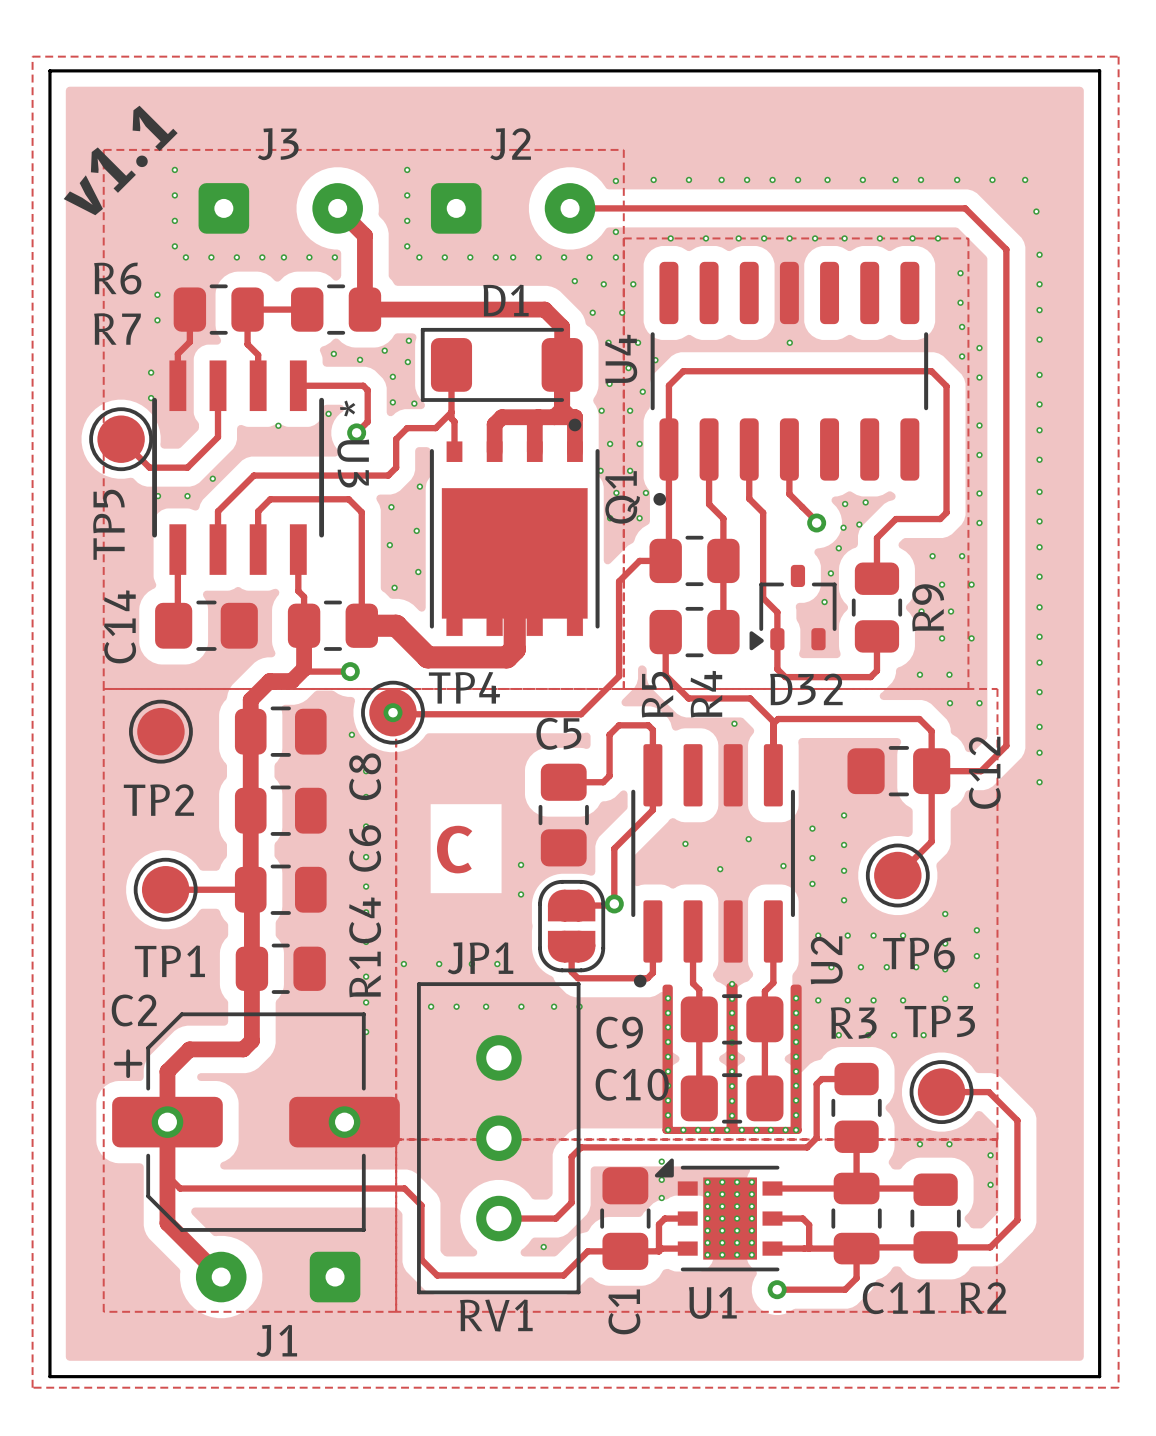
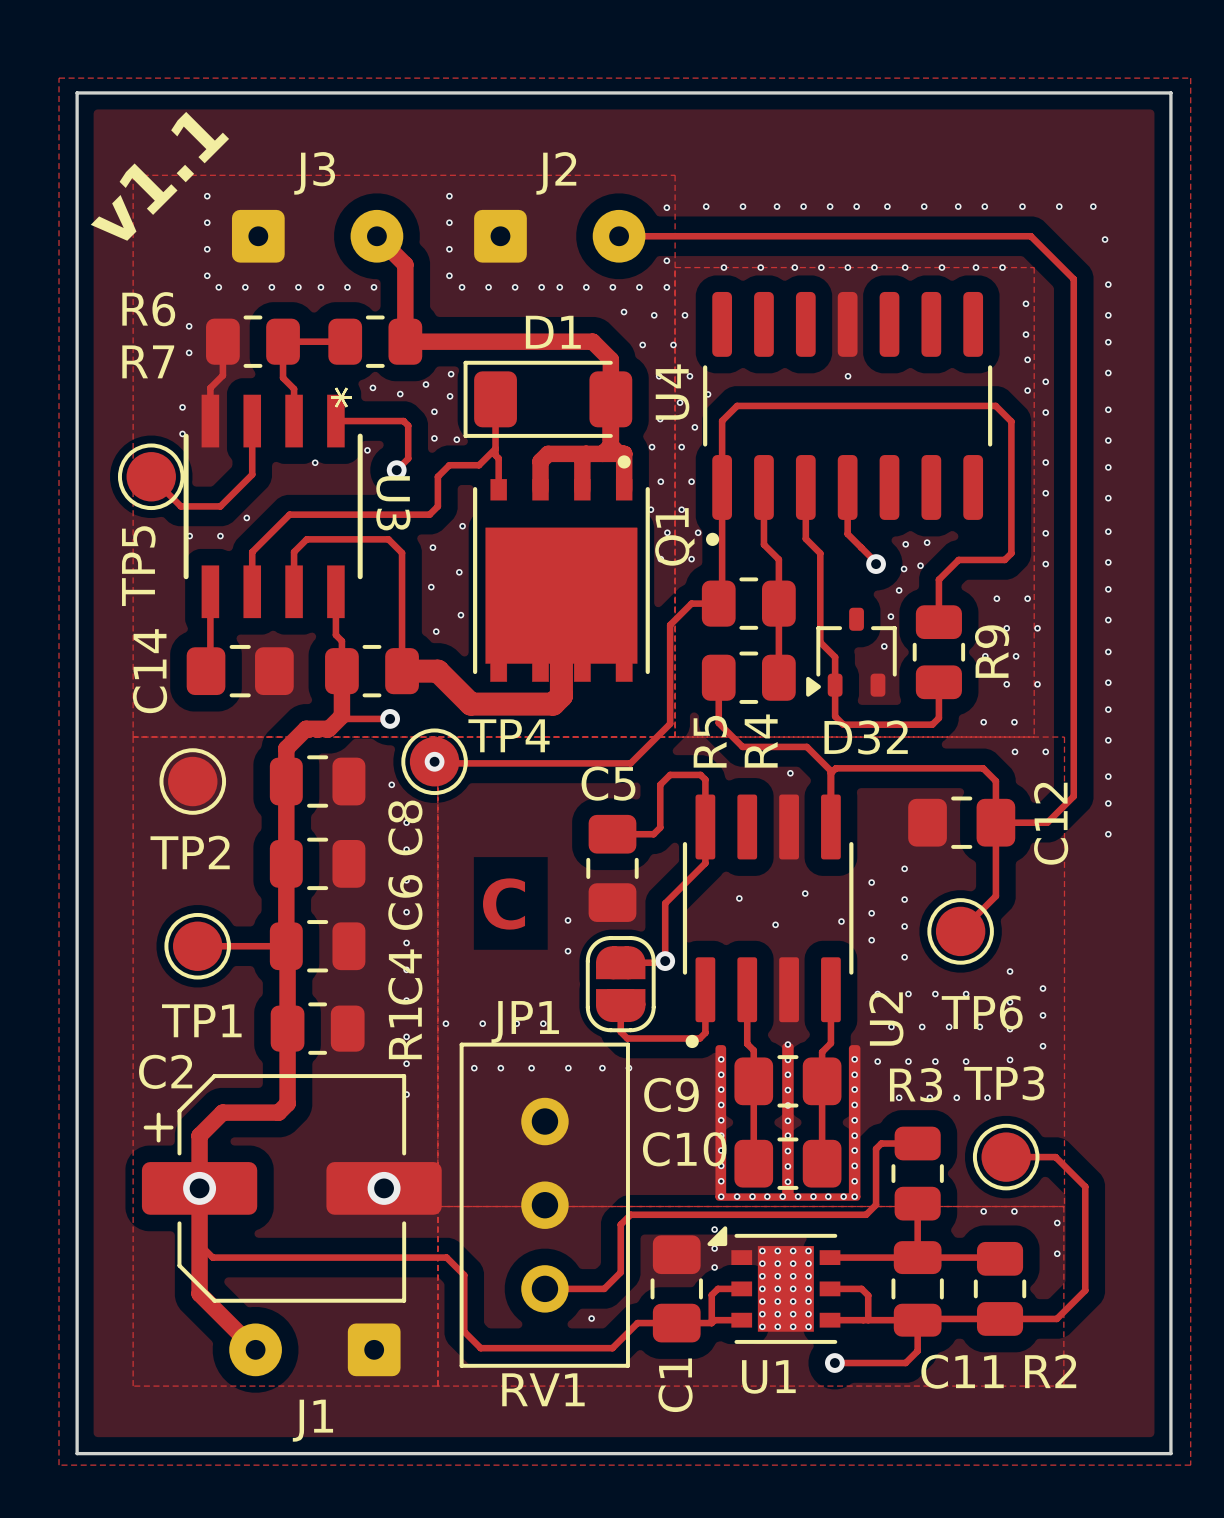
U3 footprint: [152, 360, 325, 575] -> [183, 394, 363, 619]

